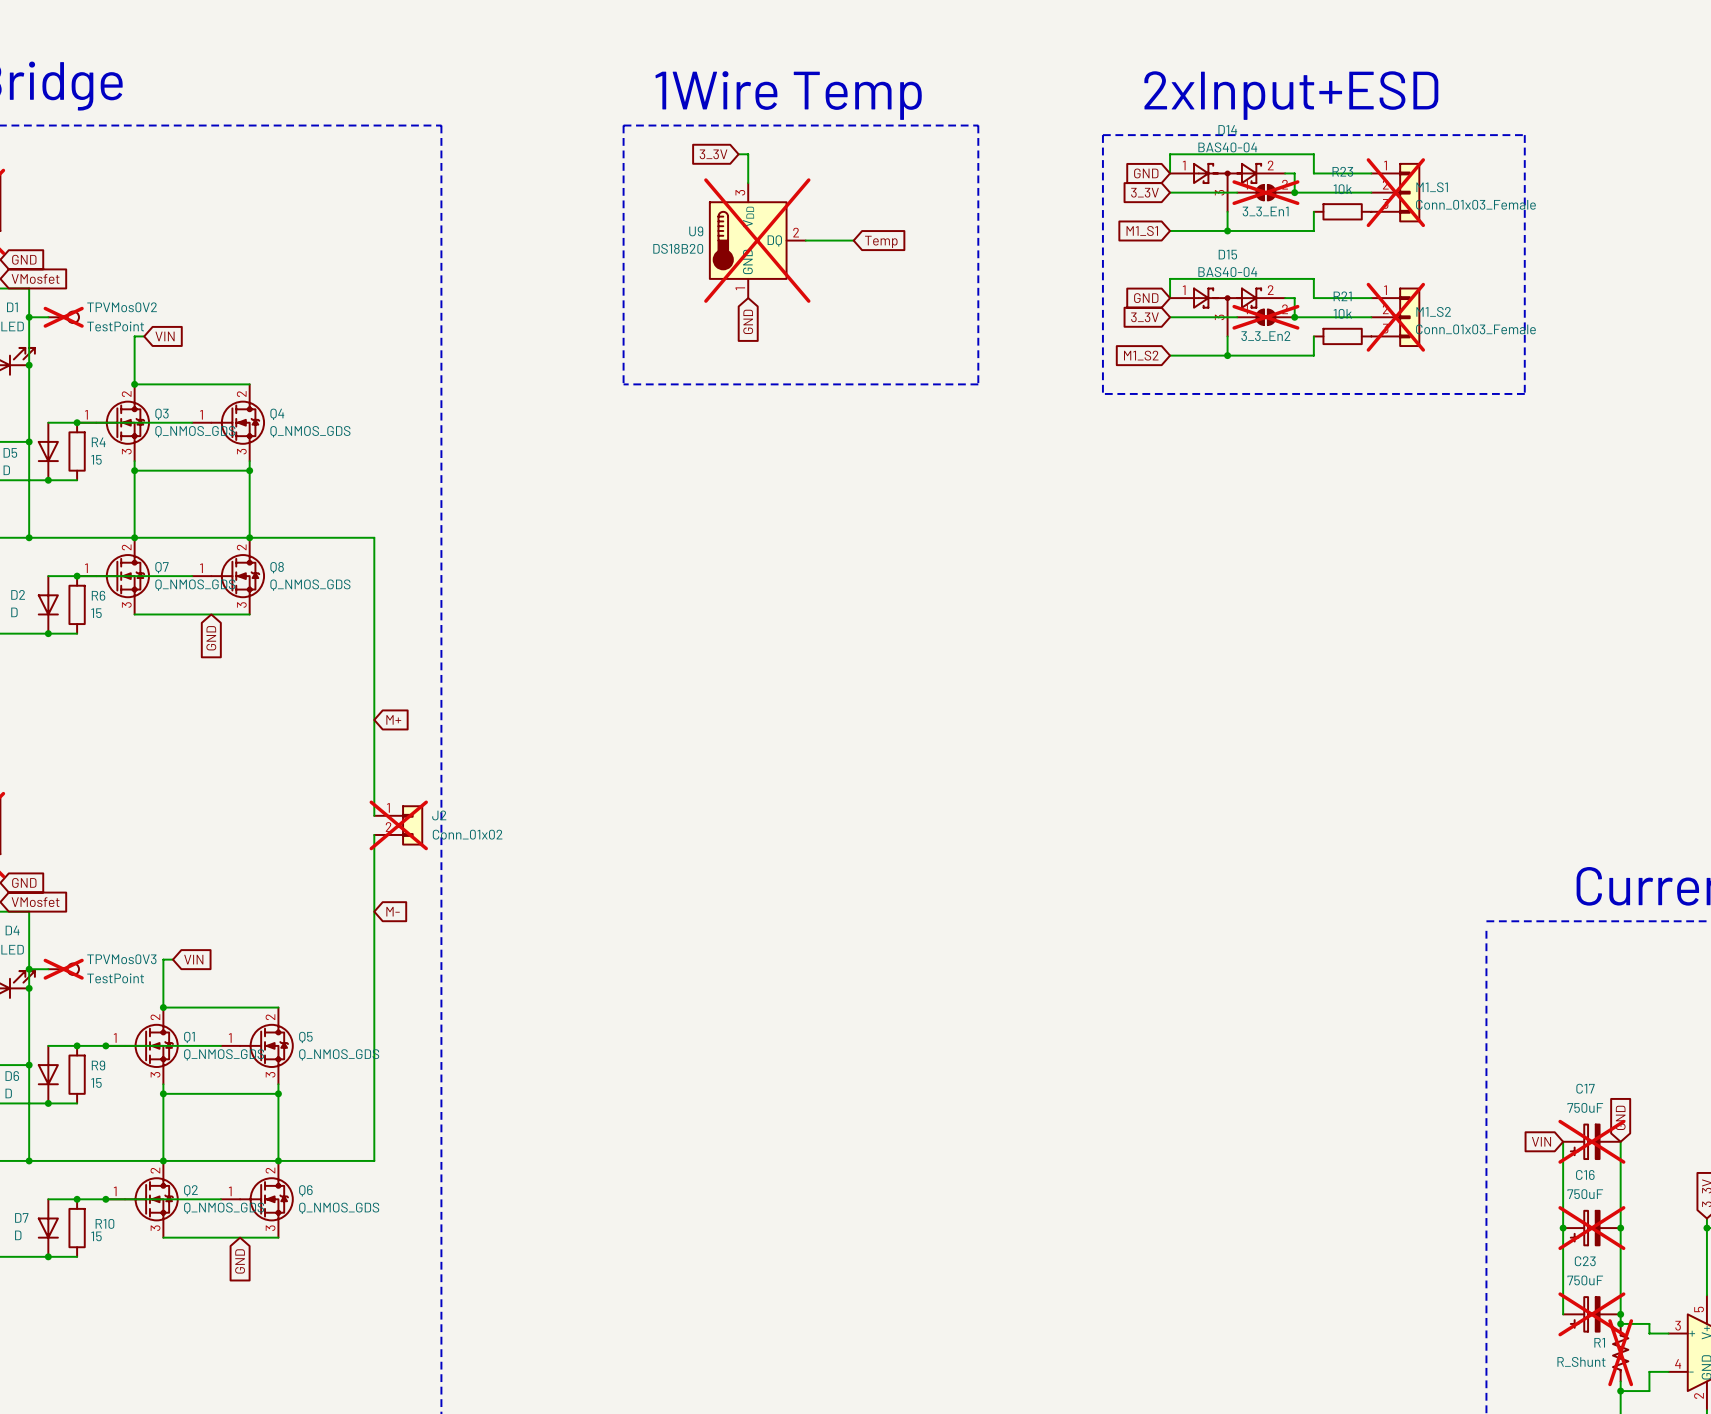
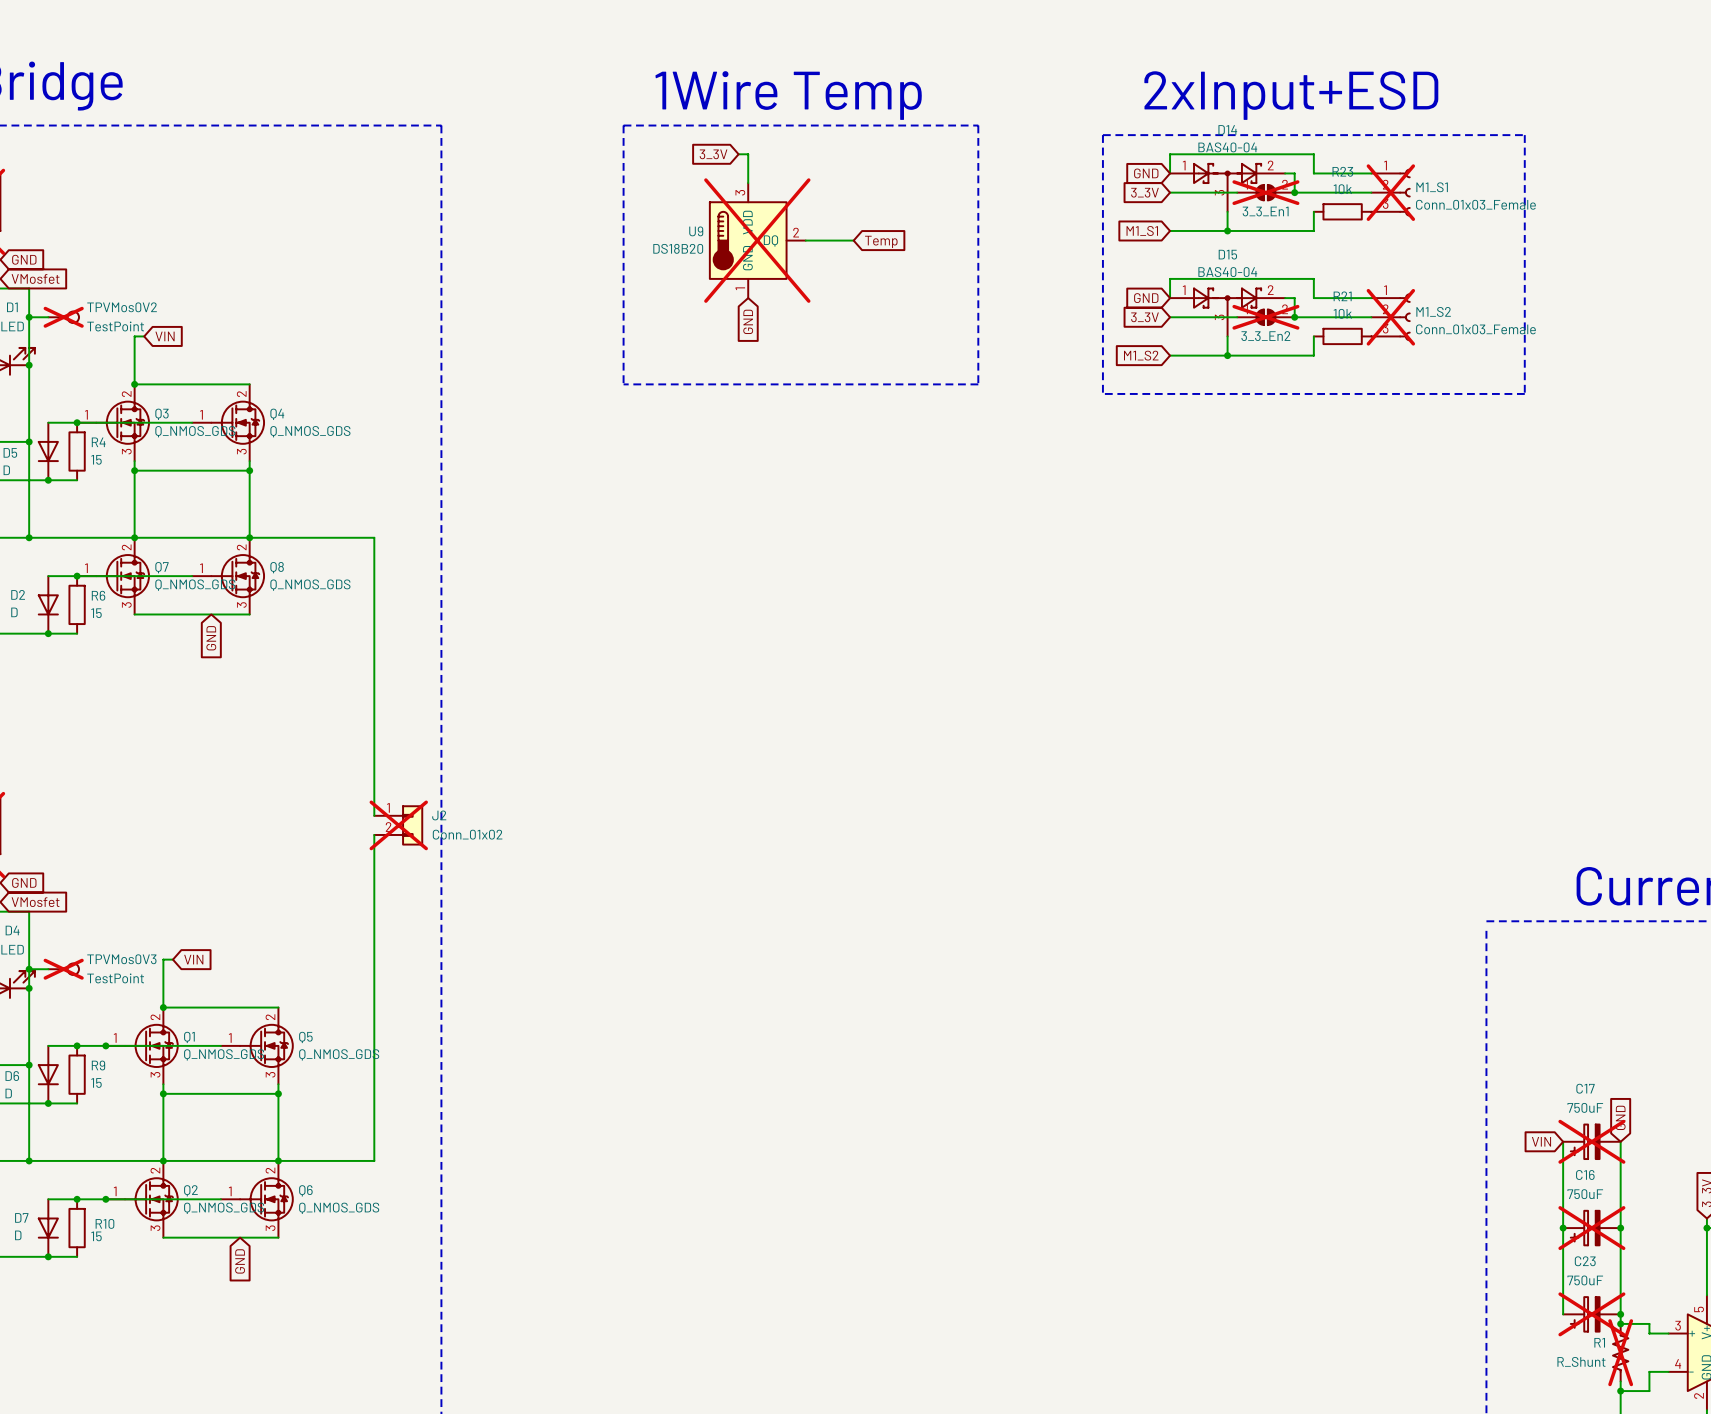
M1_S1 symbol: [1371, 162, 1421, 223] -> [1371, 169, 1411, 217]
U9 symbol: [708, 183, 806, 299] -> [708, 183, 806, 299]
M1_S2 symbol: [1371, 287, 1421, 347] -> [1371, 293, 1411, 341]
global label: M+ (393, 719) -> none
global label: M- (393, 911) -> none

